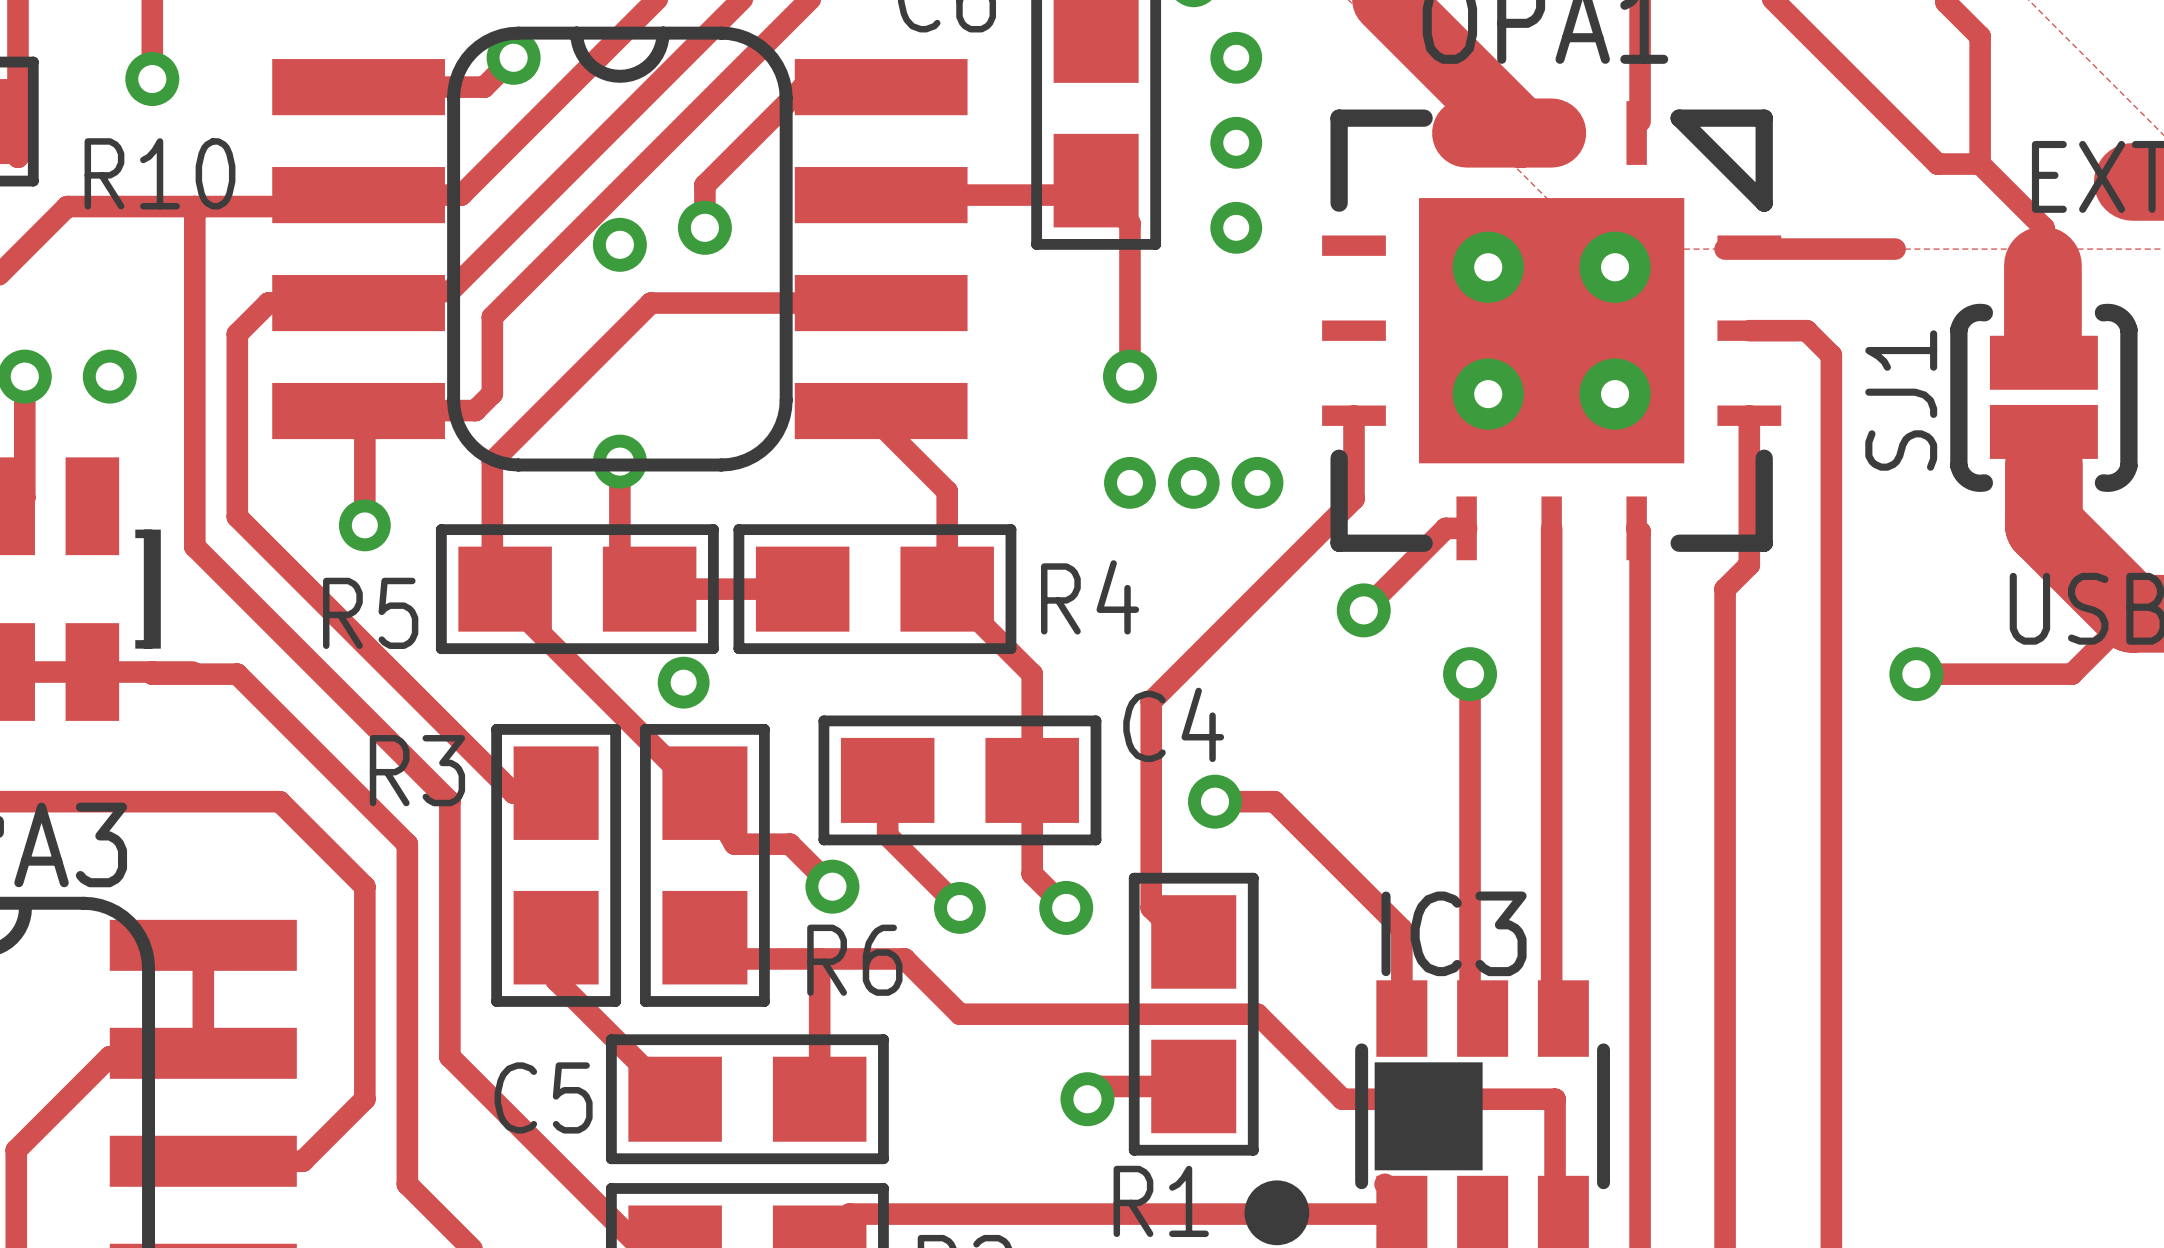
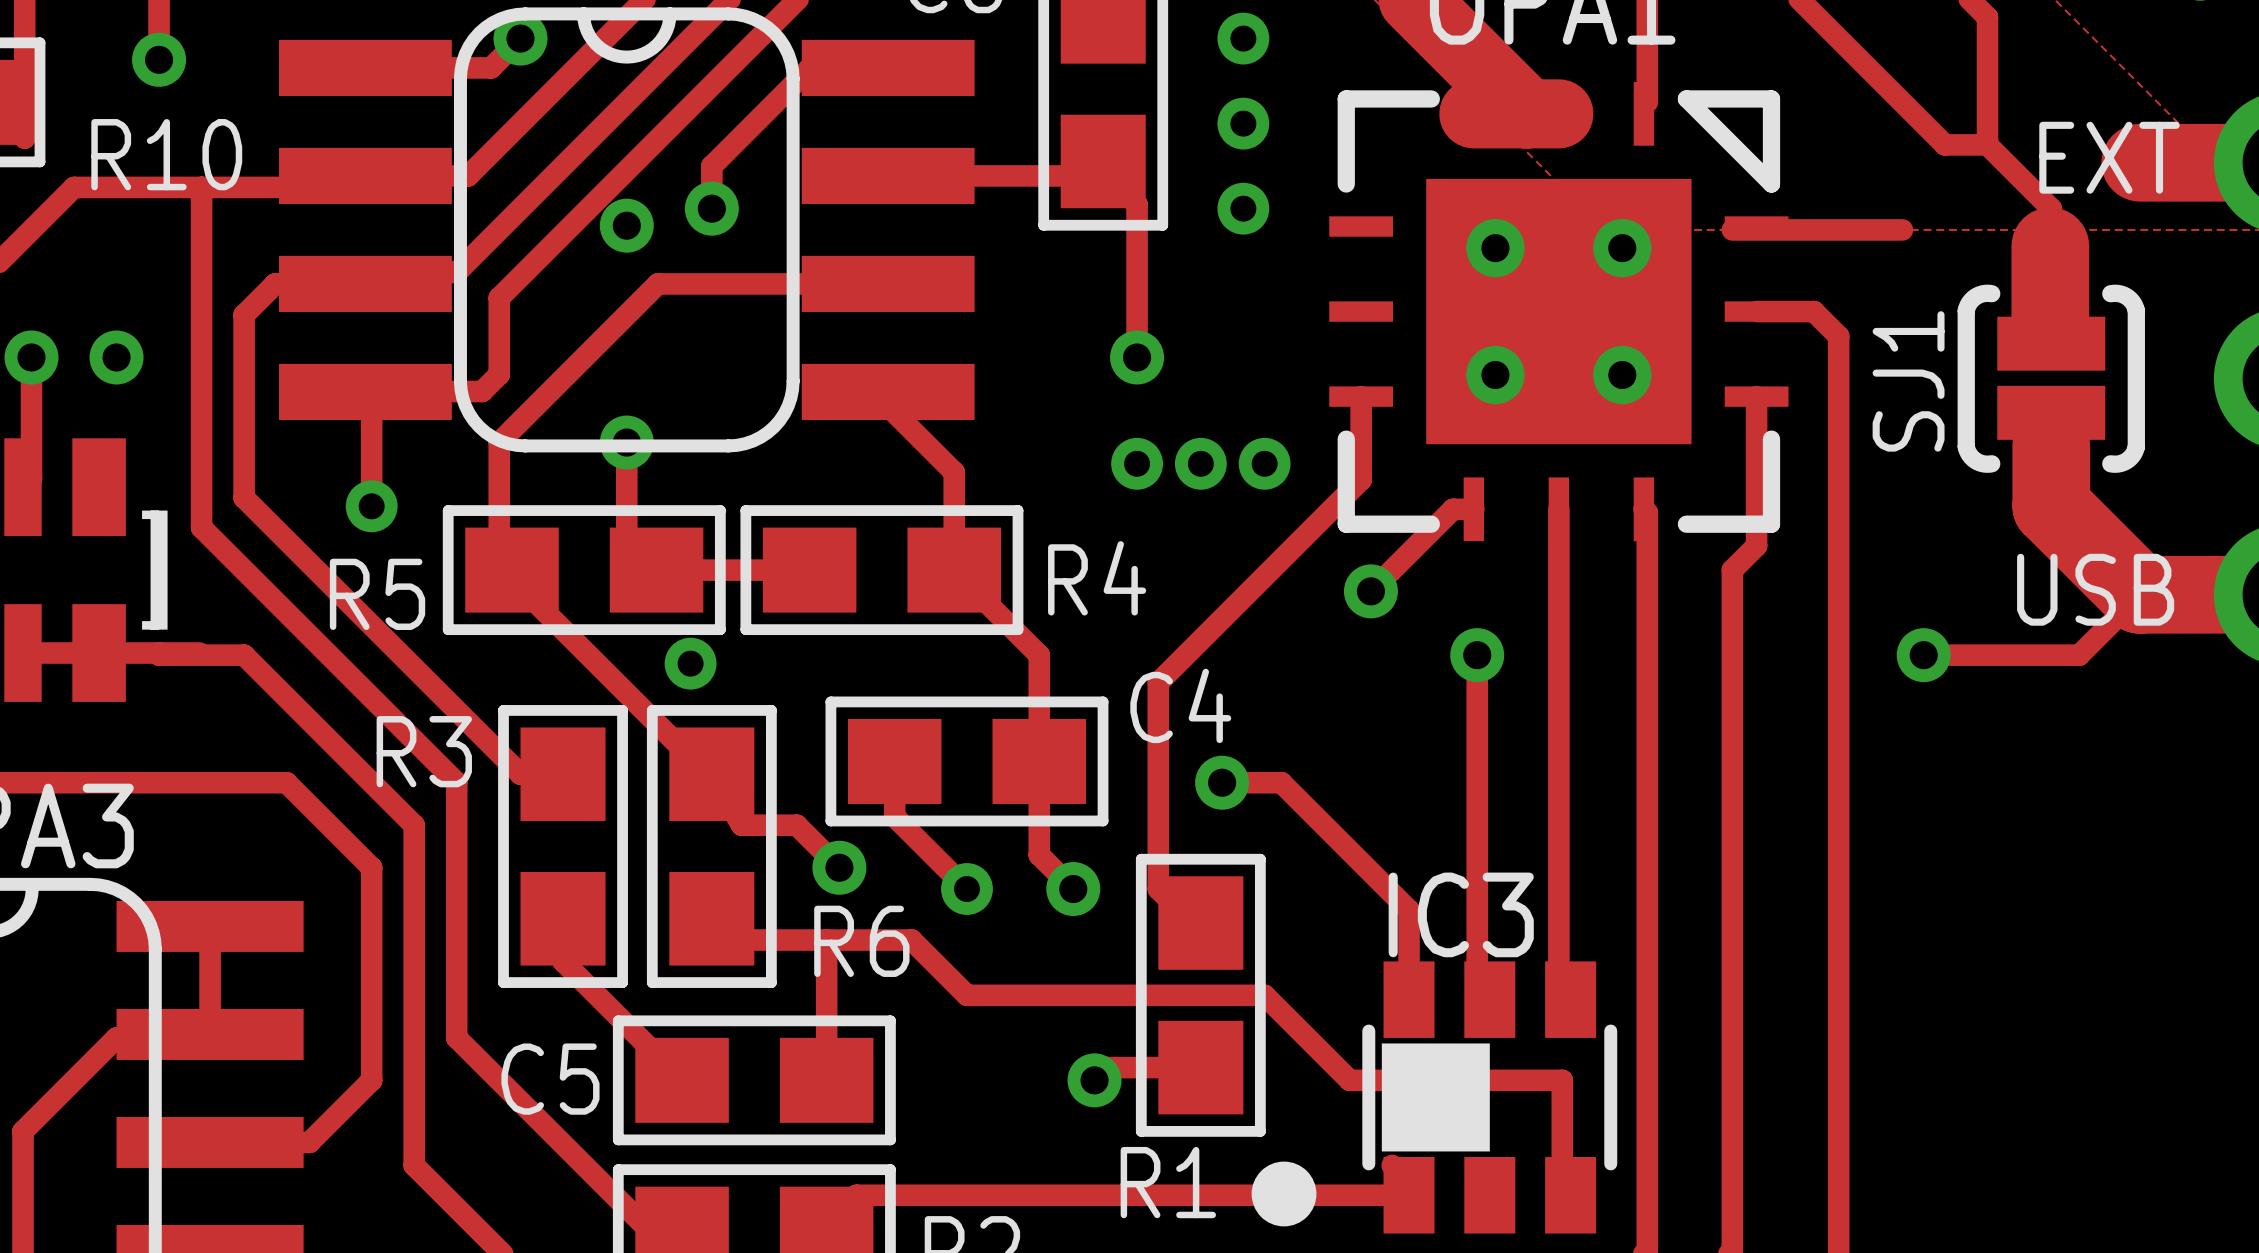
part footprint: [1322, 101, 1782, 561] -> [1329, 81, 1789, 542]

